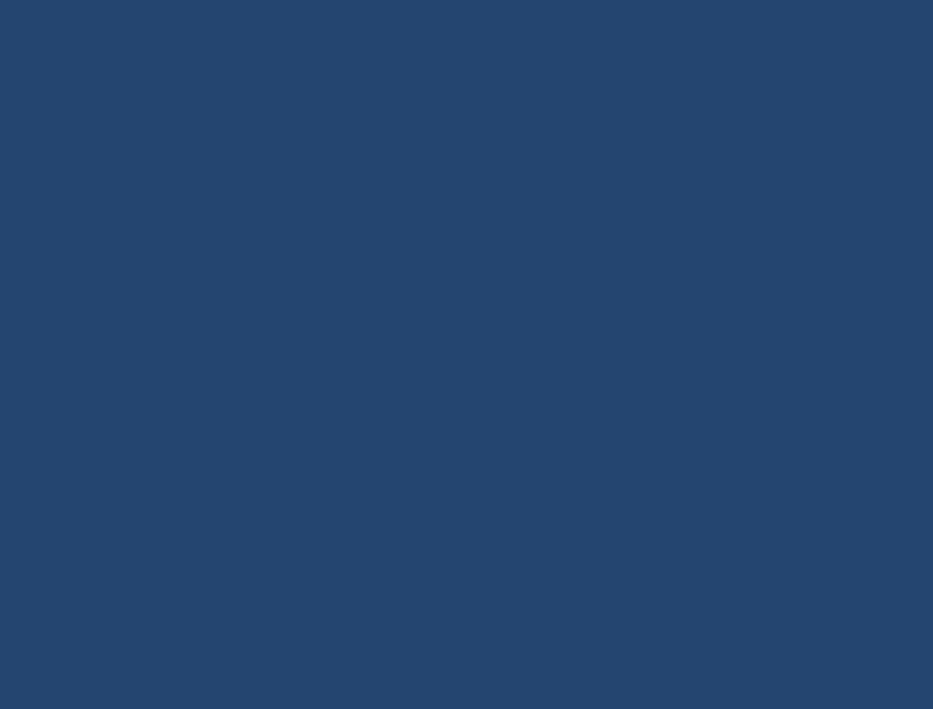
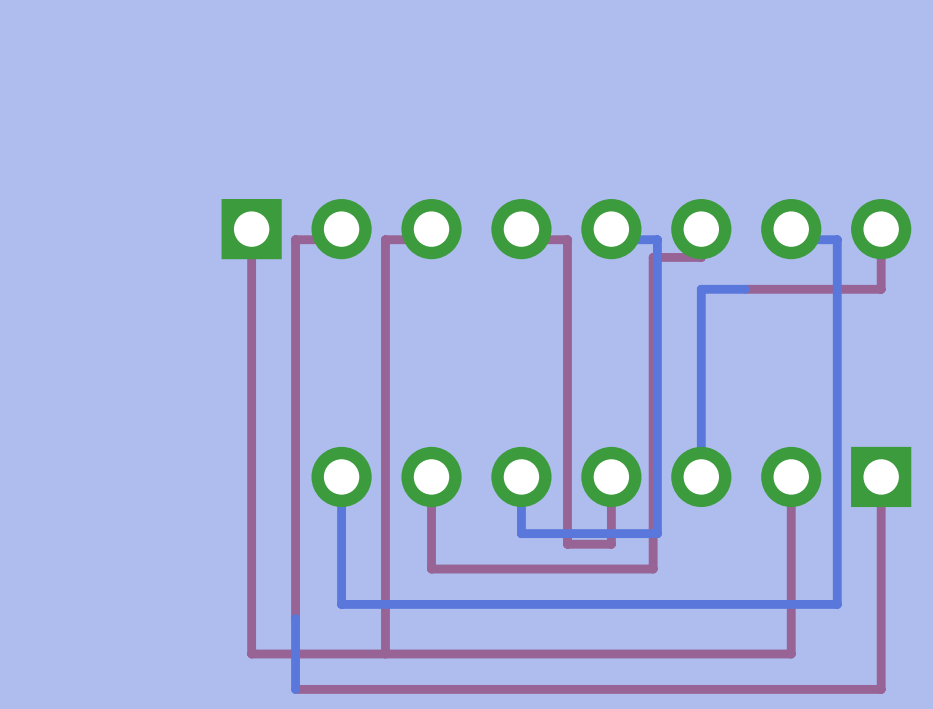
top track: none -> (251, 229) (251, 653) (791, 653) (791, 476)
top track: none -> (341, 229) (341, 239) (295, 239) (295, 618)
top track: none -> (431, 229) (431, 239) (385, 239) (385, 653)
top track: none -> (521, 229) (521, 239) (567, 239) (567, 544) (611, 544) (611, 476)
part: none -> (566, 229)
bottom track: none -> (611, 229) (611, 239) (657, 239) (657, 533) (521, 533) (521, 476)
top track: none -> (701, 229) (701, 257) (653, 257) (653, 569) (431, 569) (431, 476)
bottom track: none -> (791, 229) (791, 239) (837, 239) (837, 604) (341, 604) (341, 476)
top track: none -> (881, 229) (881, 289) (745, 289)
bottom track: none -> (745, 289) (701, 289) (701, 476)
part: none -> (611, 476)
top track: none -> (881, 476) (881, 689) (295, 689)
bottom track: none -> (295, 618) (295, 689)

